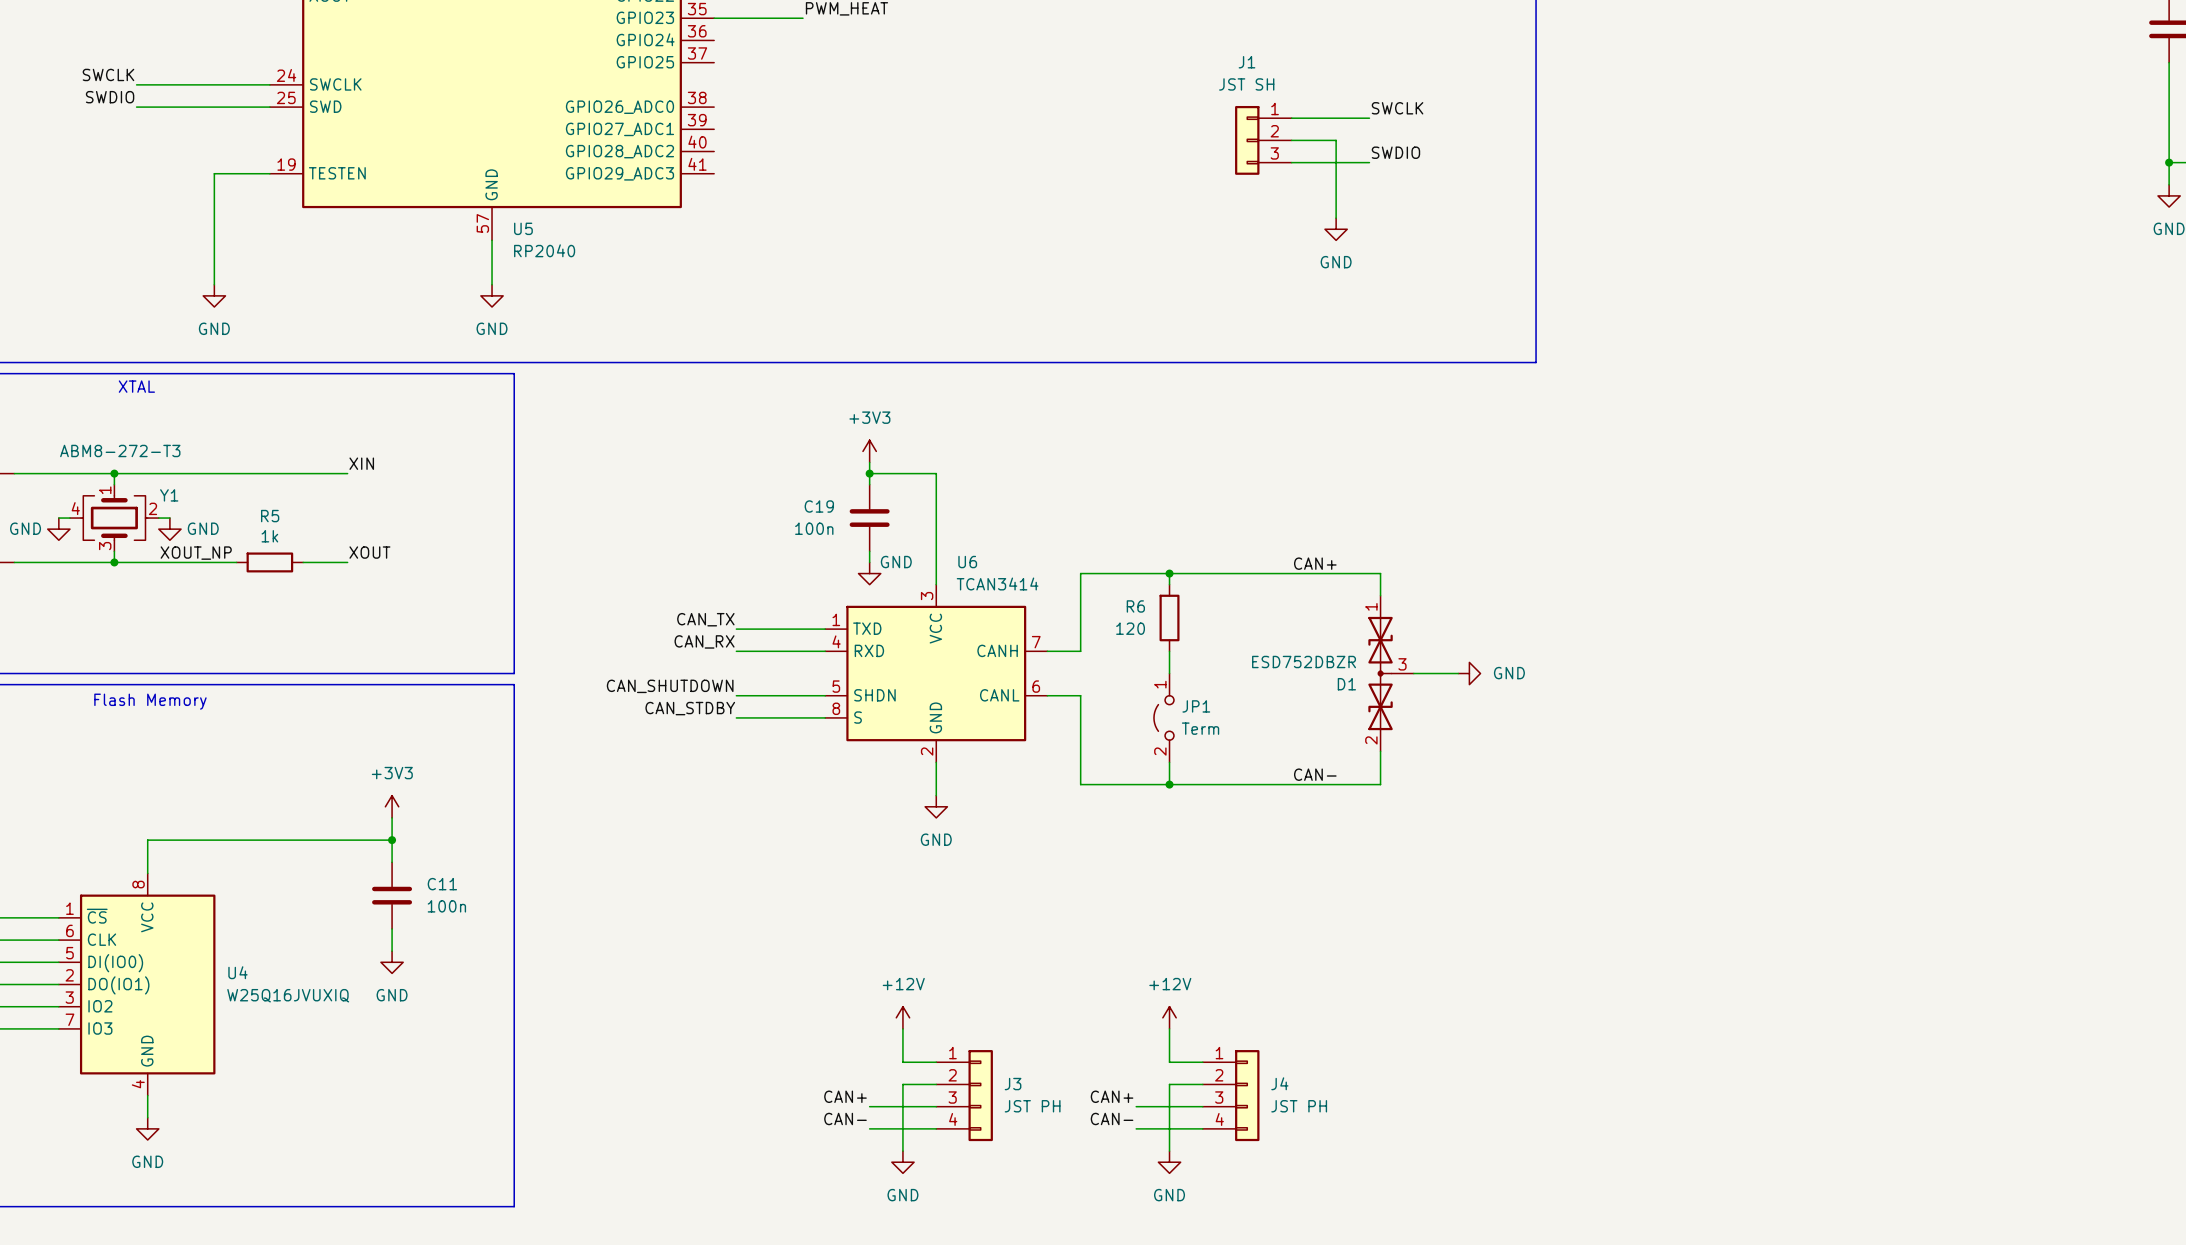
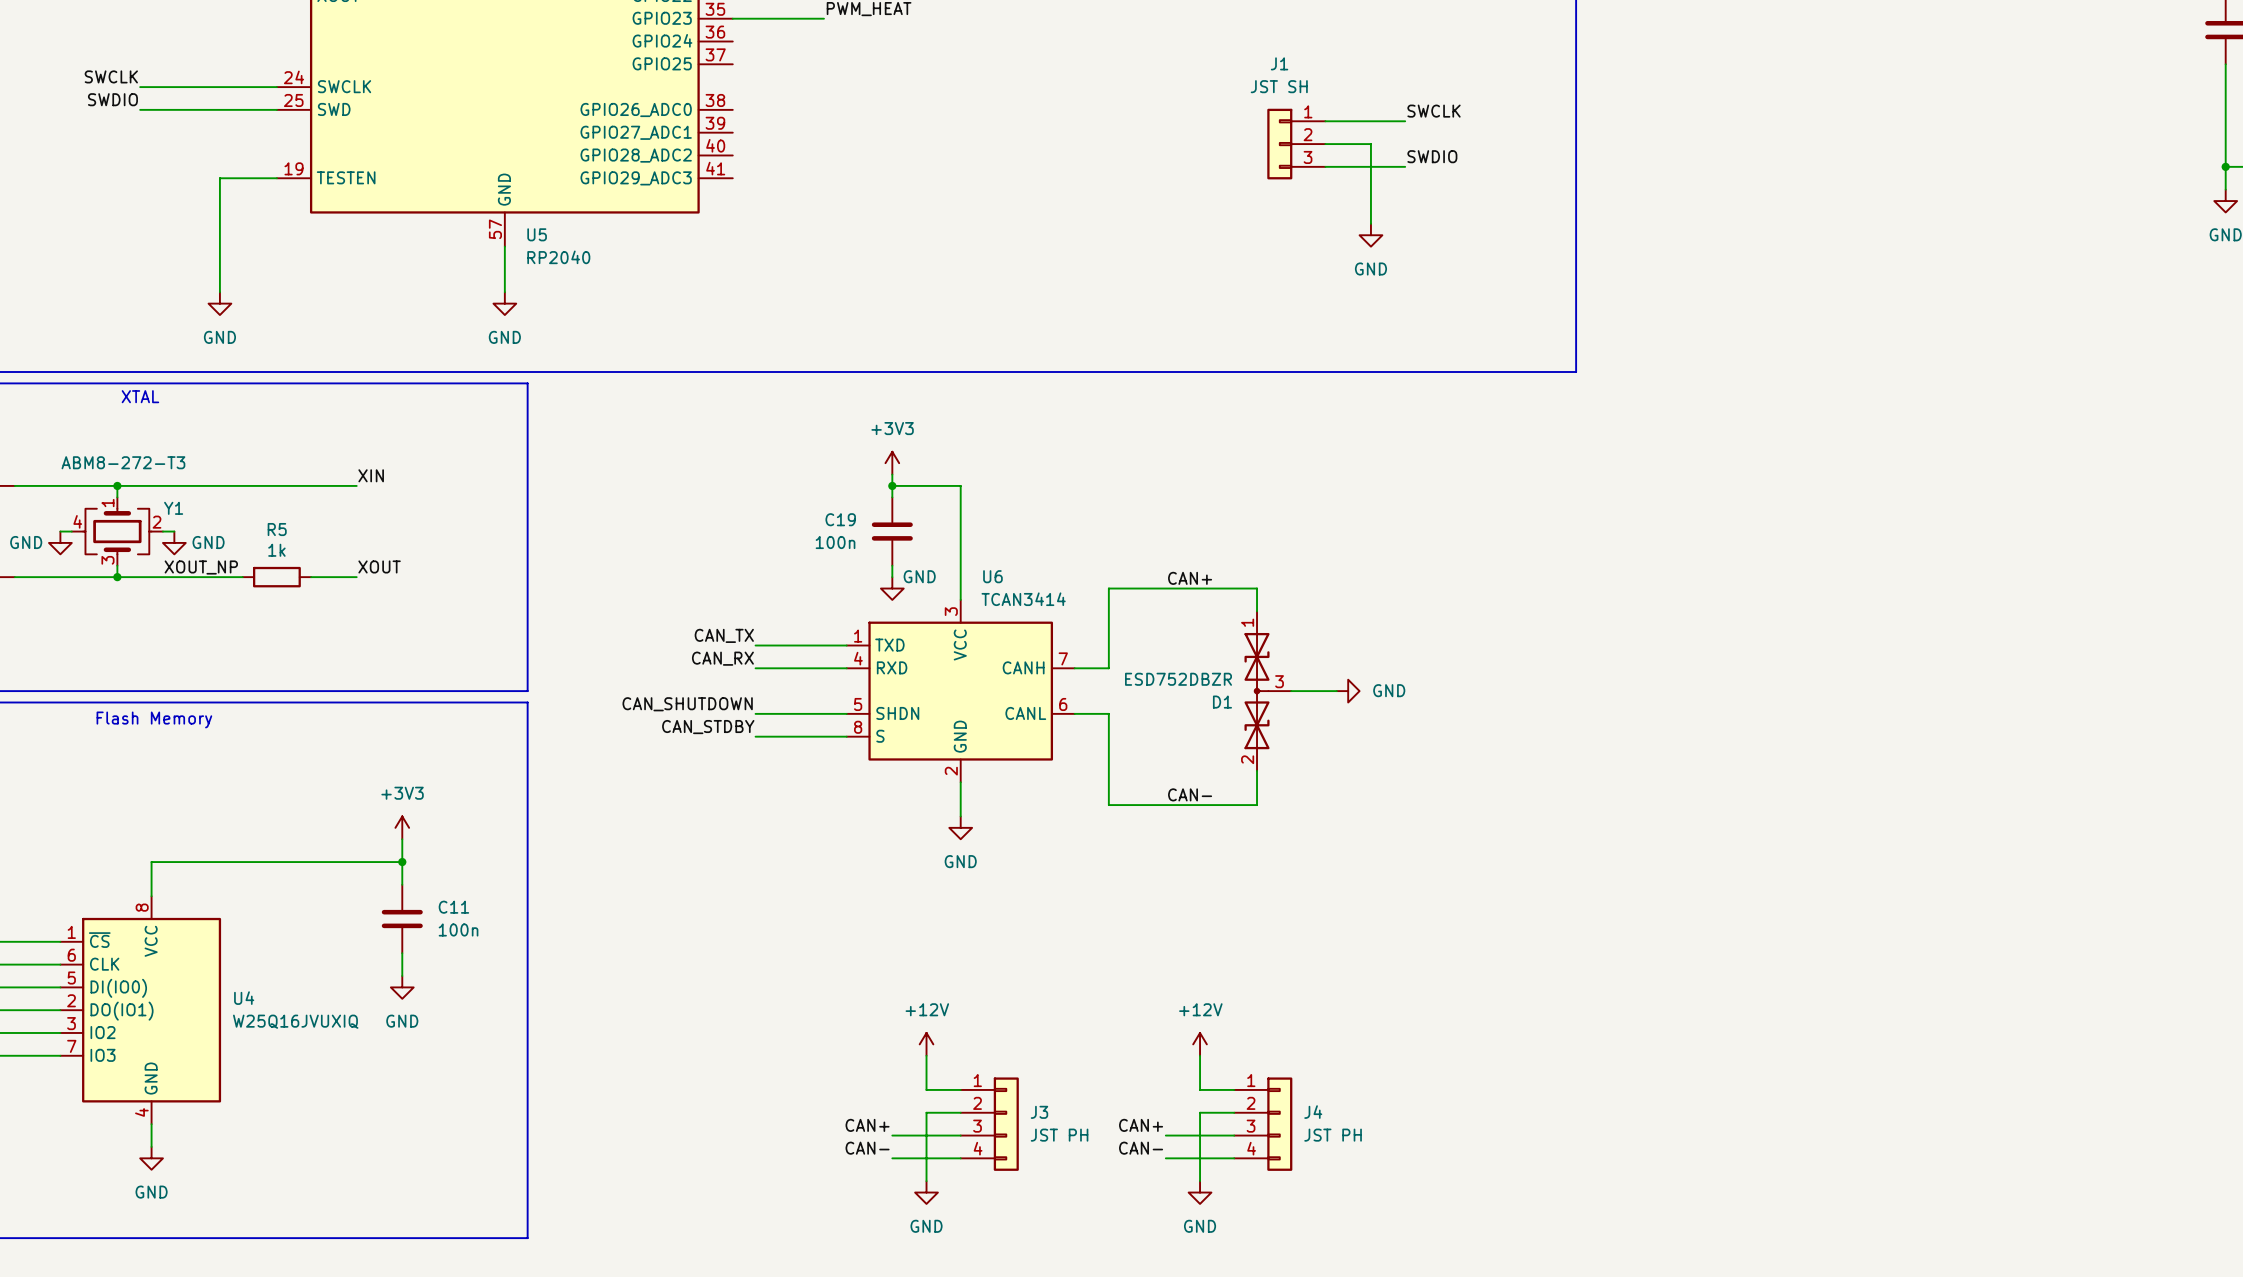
label position: CAN+ (1315, 563) -> CAN+ (1190, 578)
wire: (1169, 573) (1169, 584) -> none
junction: (1169, 573) -> none
wire: (1225, 573) (1380, 573) (1380, 595) -> (1257, 588) (1257, 611)
R6: 120 (1169, 617) -> none
wire: (1169, 651) (1169, 673) -> none
D1 position: (1391, 673) -> (1267, 691)
wire: (1413, 673) (1458, 673) -> (1291, 691) (1336, 691)
power symbol position: GND (1469, 673) -> GND (1348, 691)
JP1: Term (1163, 717) -> none
wire: (1380, 751) (1380, 784) (1225, 784) -> (1257, 770) (1257, 805)
wire: (1169, 762) (1169, 784) -> none
label position: CAN- (1315, 774) -> CAN- (1190, 794)
junction: (1169, 784) -> none

